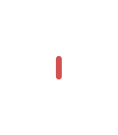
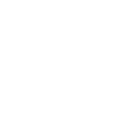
top track: (58, 58) (58, 76) -> none

